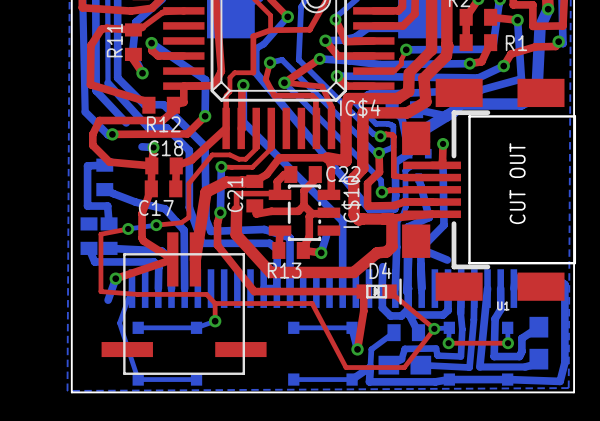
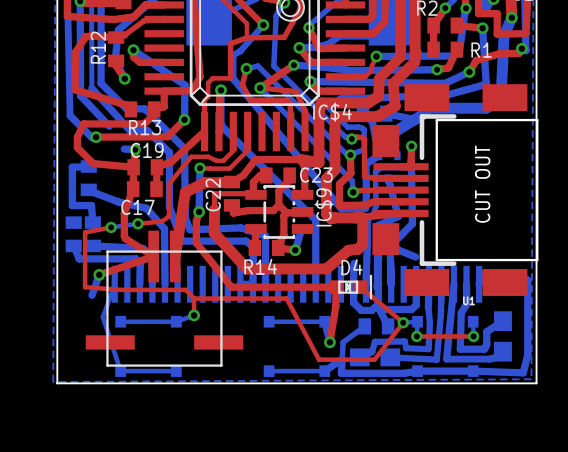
R11 name: R11 (114, 40) -> R12 (98, 47)
R12 name: R12 (163, 124) -> R13 (145, 127)
C18 name: C18 (166, 148) -> C19 (147, 150)
C22 name: C22 (343, 174) -> C23 (316, 175)
C21 name: C21 (235, 194) -> C22 (213, 194)
IC$10 name: IC$10 (351, 201) -> IC$9 (324, 207)
R13 name: R13 (284, 270) -> R14 (260, 266)

